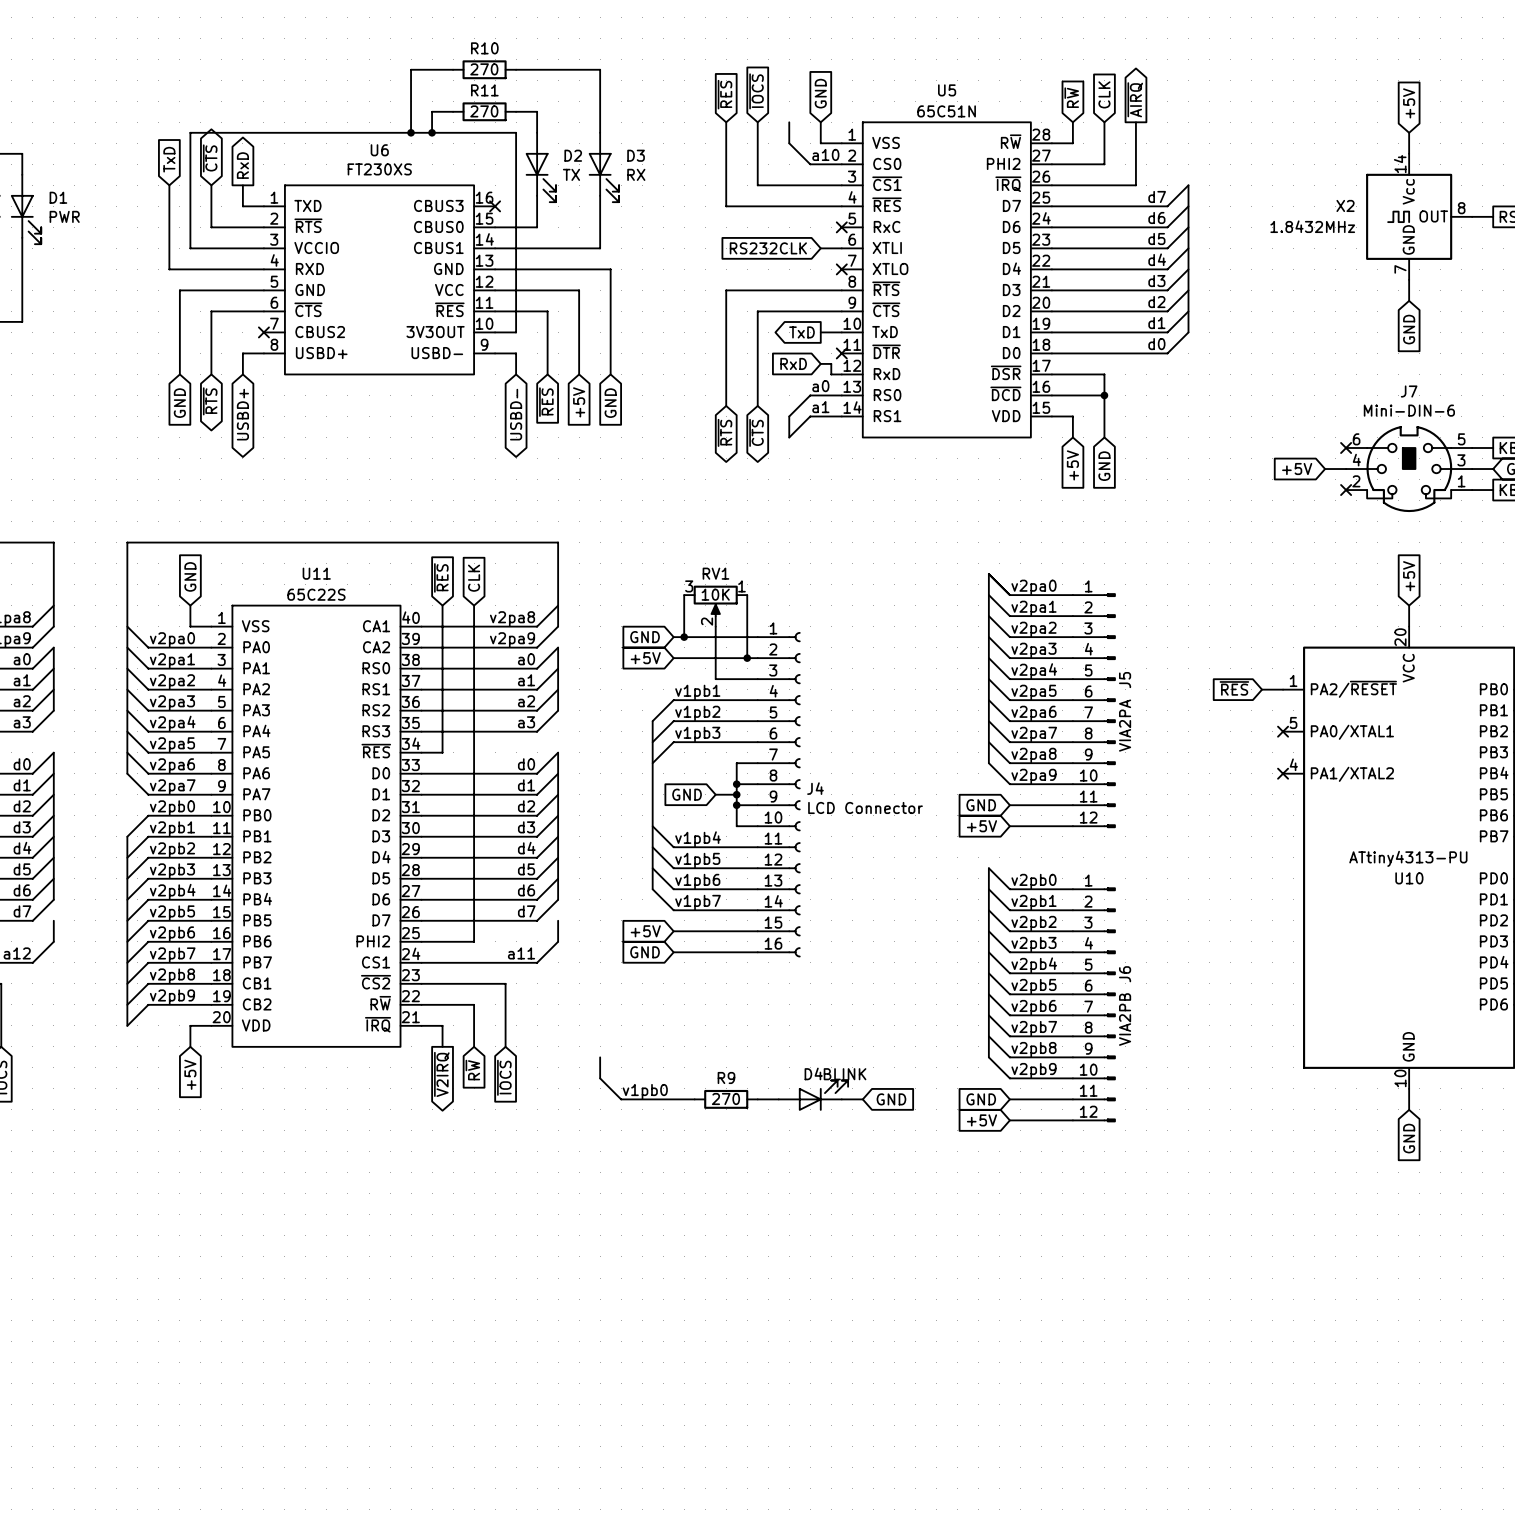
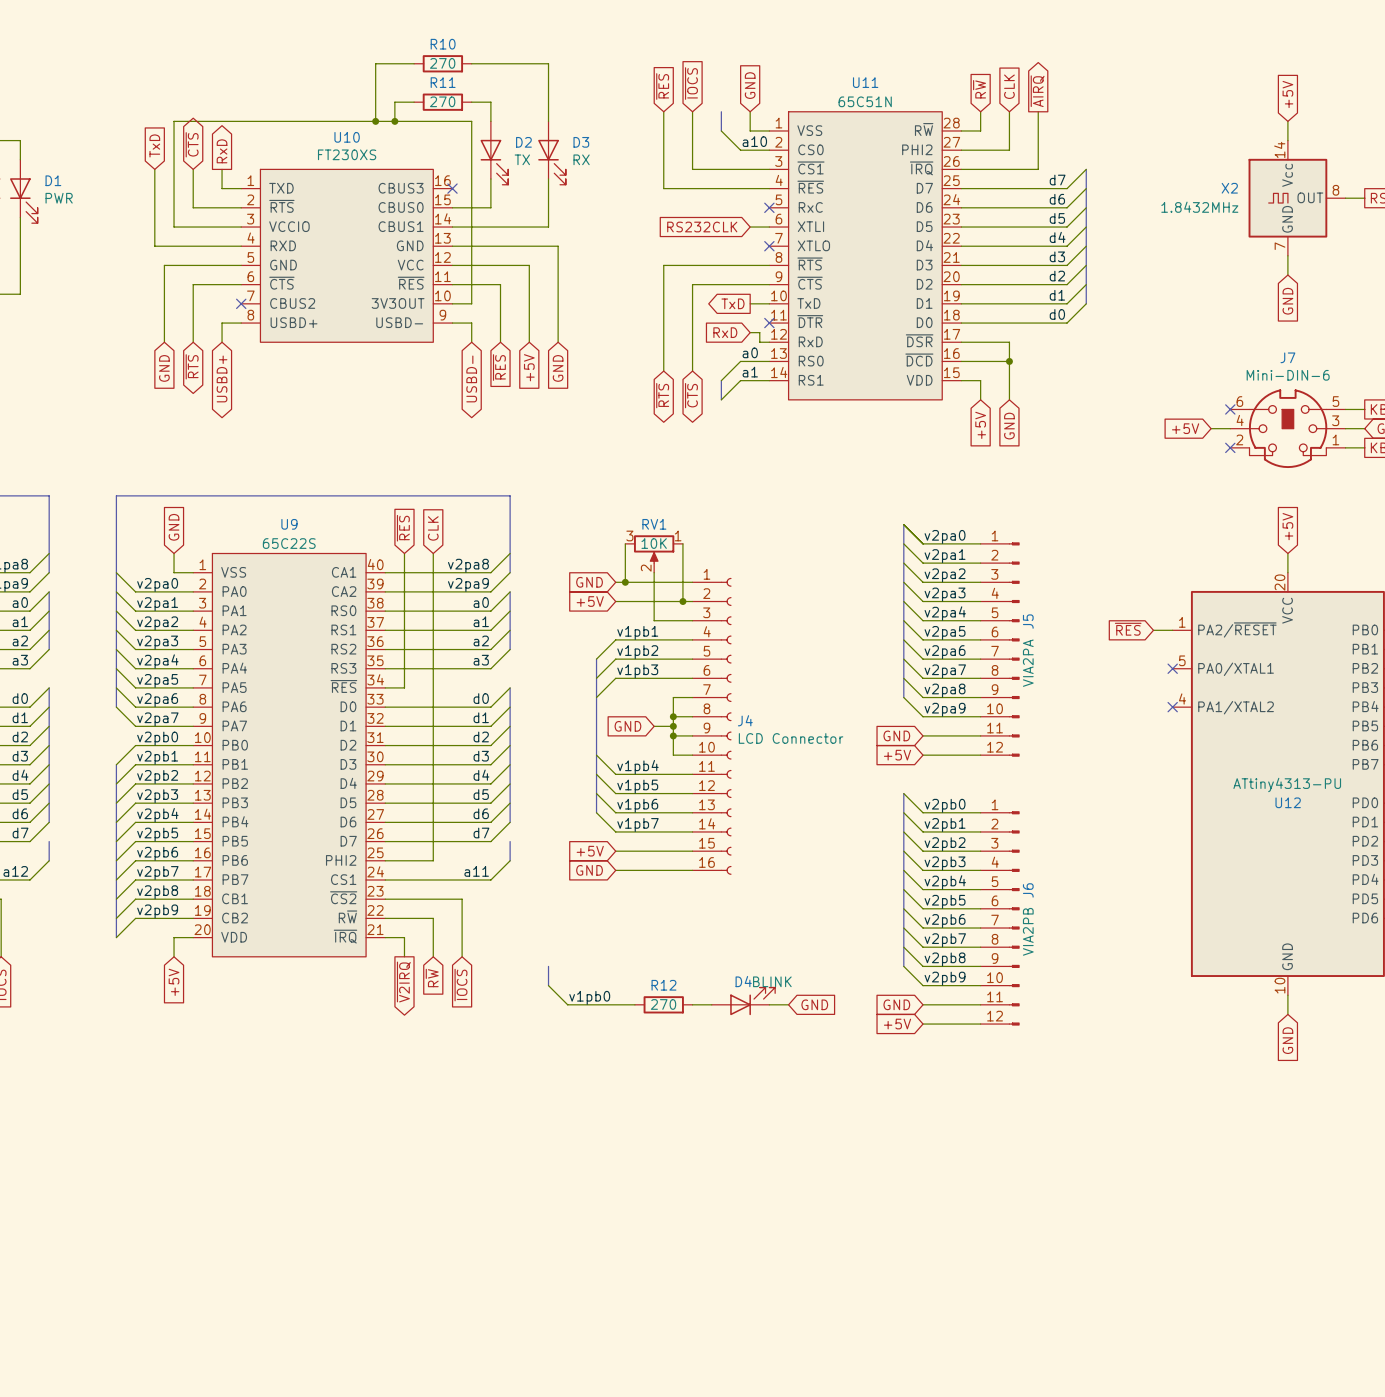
U5 name: U5 (947, 90) -> U11 (865, 82)
U6 name: U6 (379, 150) -> U10 (347, 137)
U11 name: U11 (316, 573) -> U9 (289, 524)
U10 name: U10 (1409, 878) -> U12 (1288, 802)
R9 name: R9 (726, 1077) -> R12 (663, 985)

